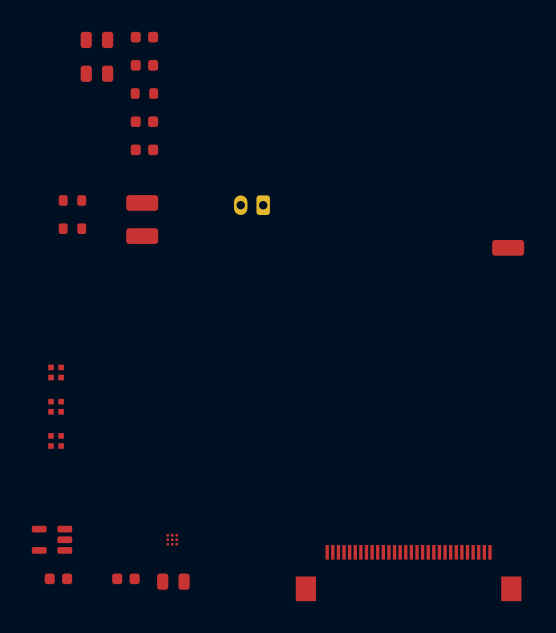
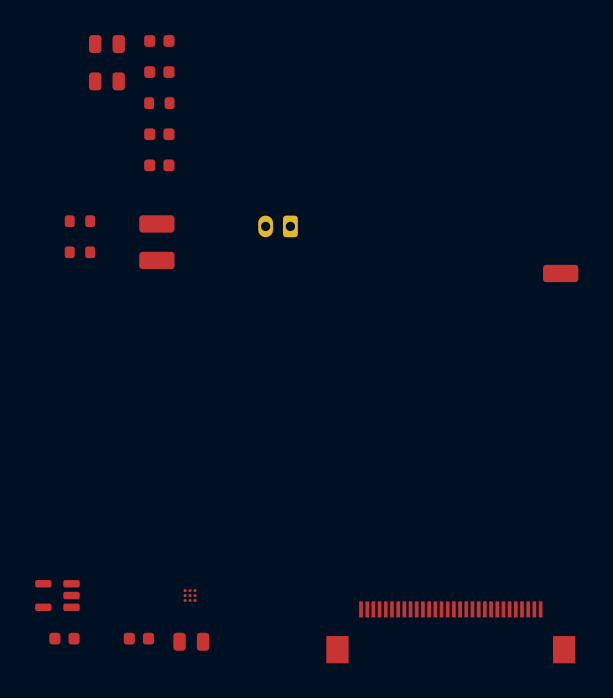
part: (56, 372) -> none
part: (56, 406) -> none
part: (56, 440) -> none

